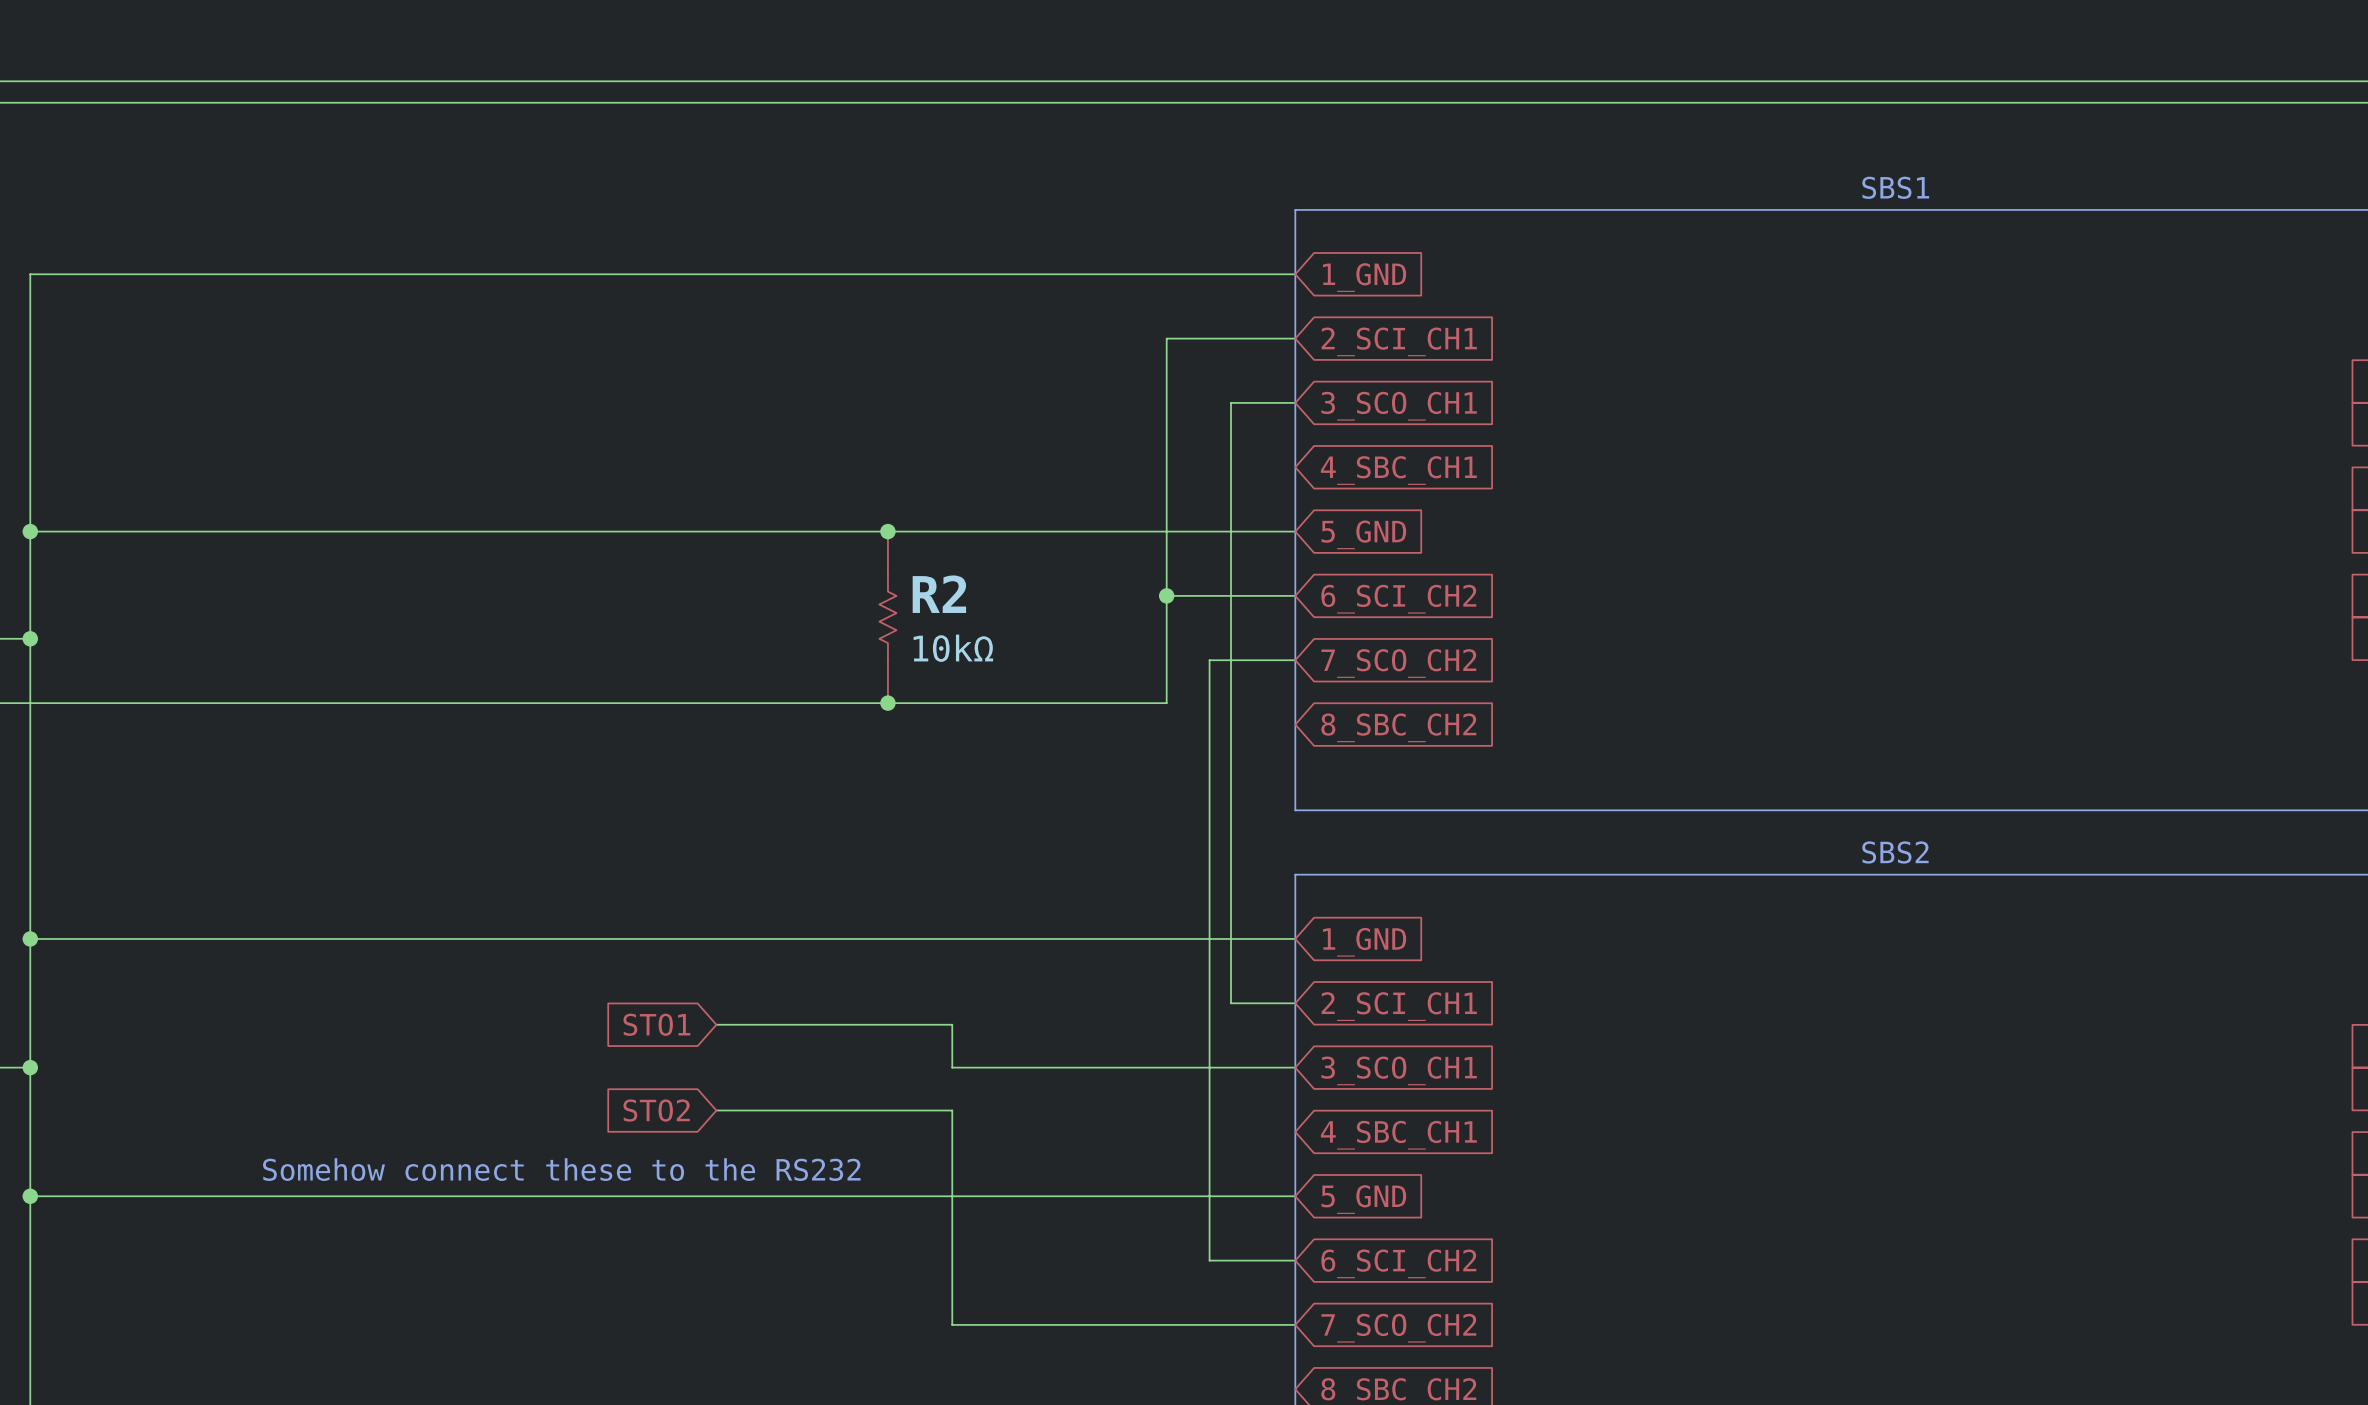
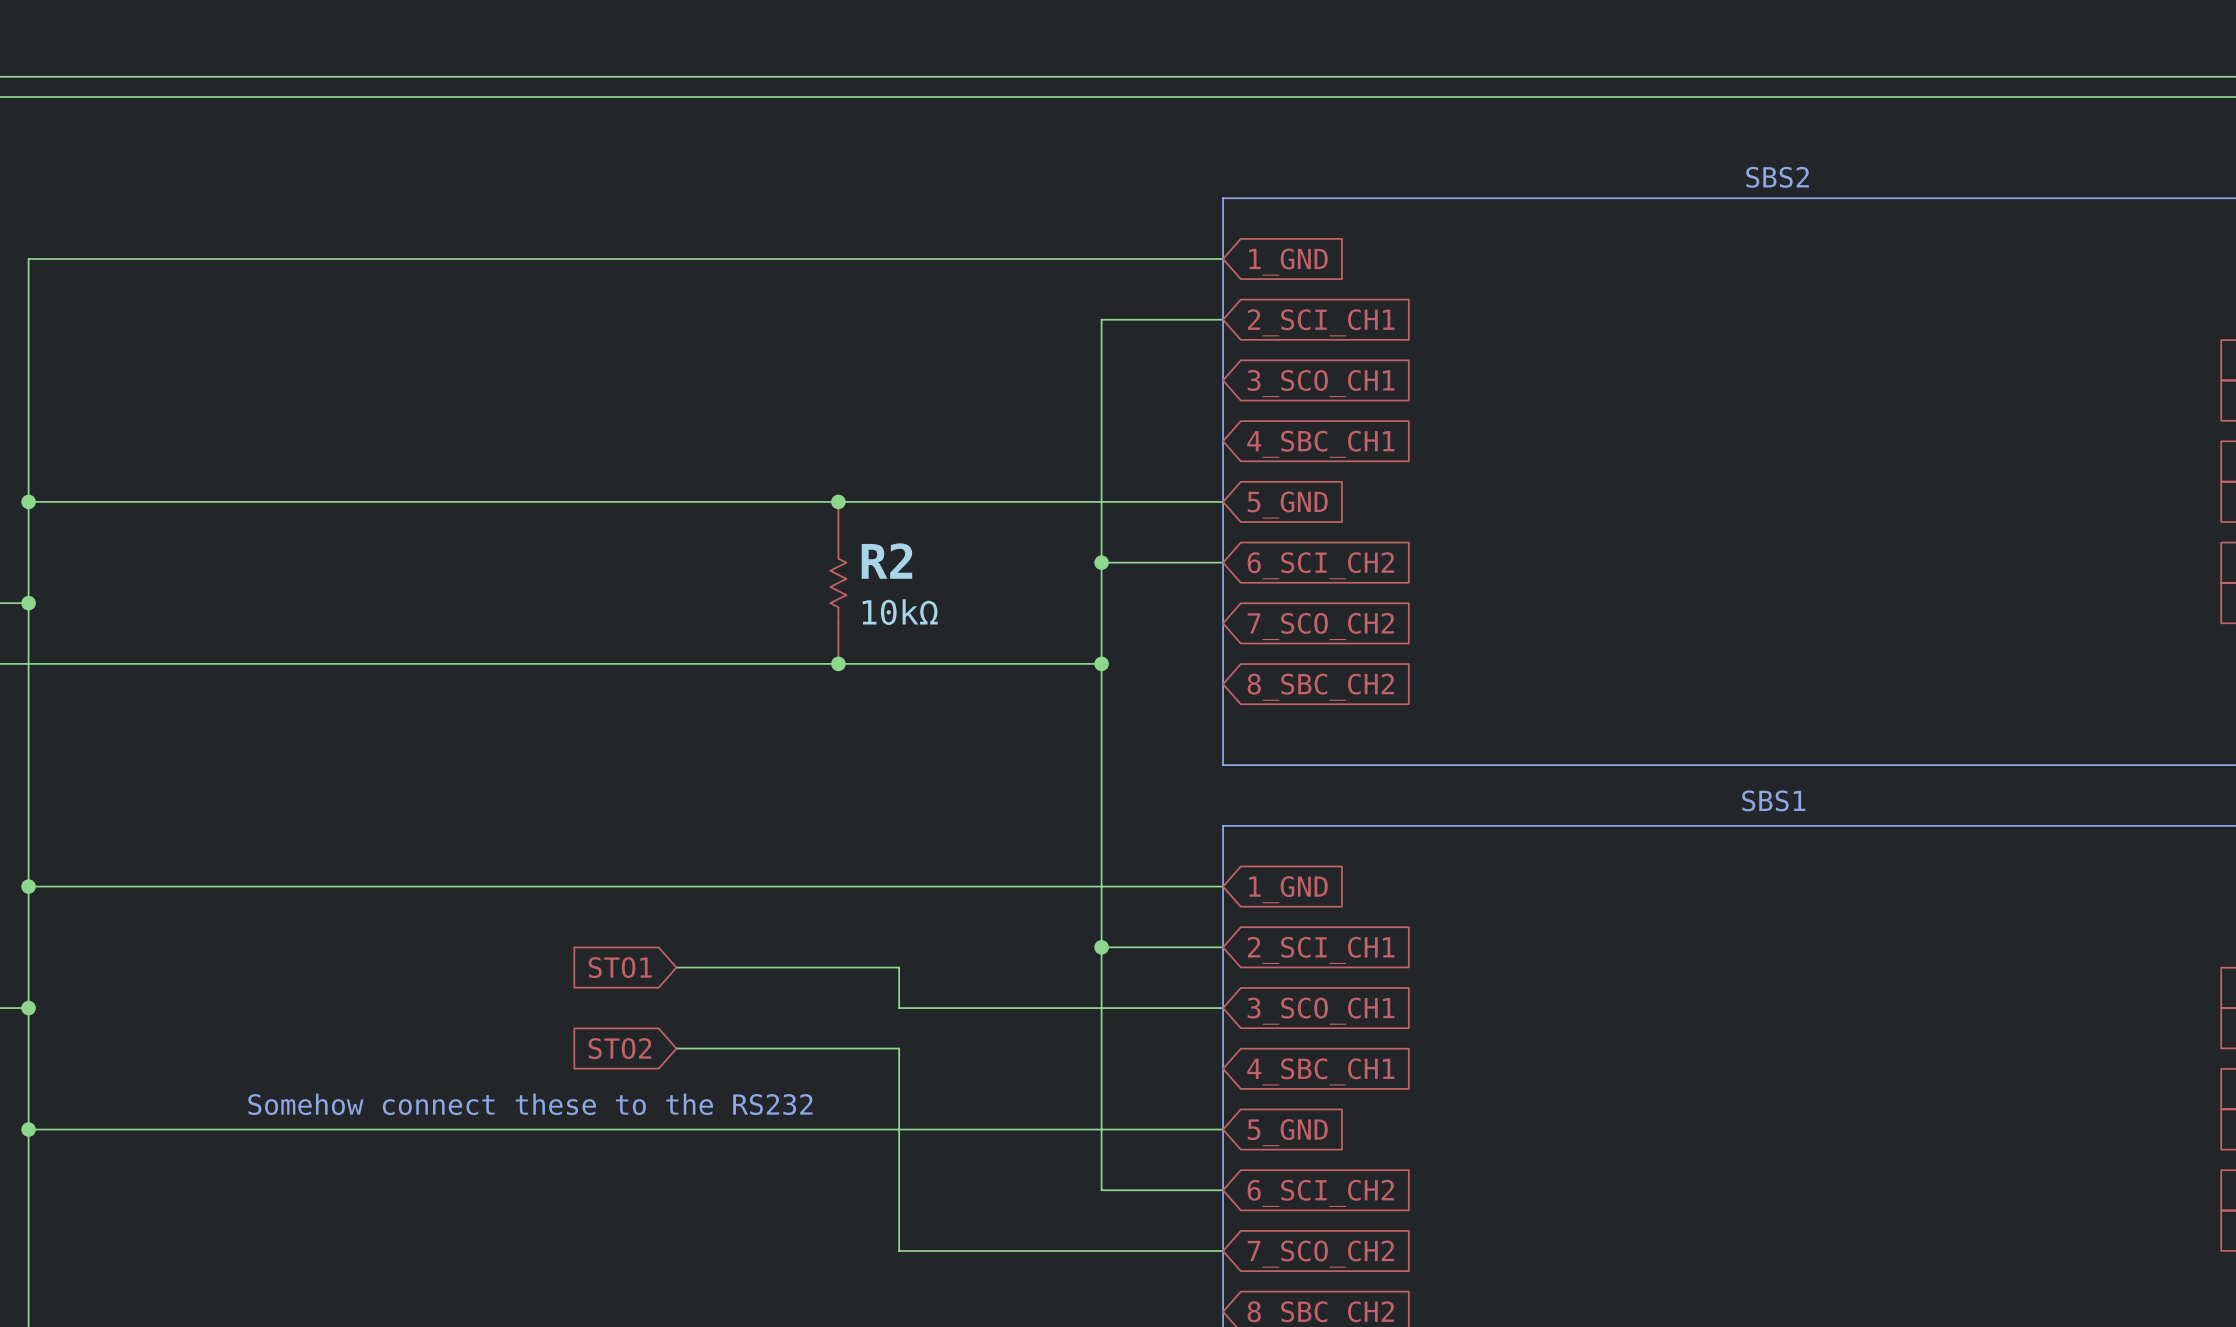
text: SBS1 (1895, 187) -> SBS2 (1777, 177)
wire: (1295, 402) (1231, 402) (1231, 1003) -> (1101, 947) (1162, 947)
wire: (1295, 660) (1209, 660) (1209, 1260) -> (1101, 663) (1101, 1190) (1142, 1190)
junction: none -> (1101, 663)
text: SBS2 (1895, 852) -> SBS1 (1773, 800)
junction: none -> (1101, 947)

